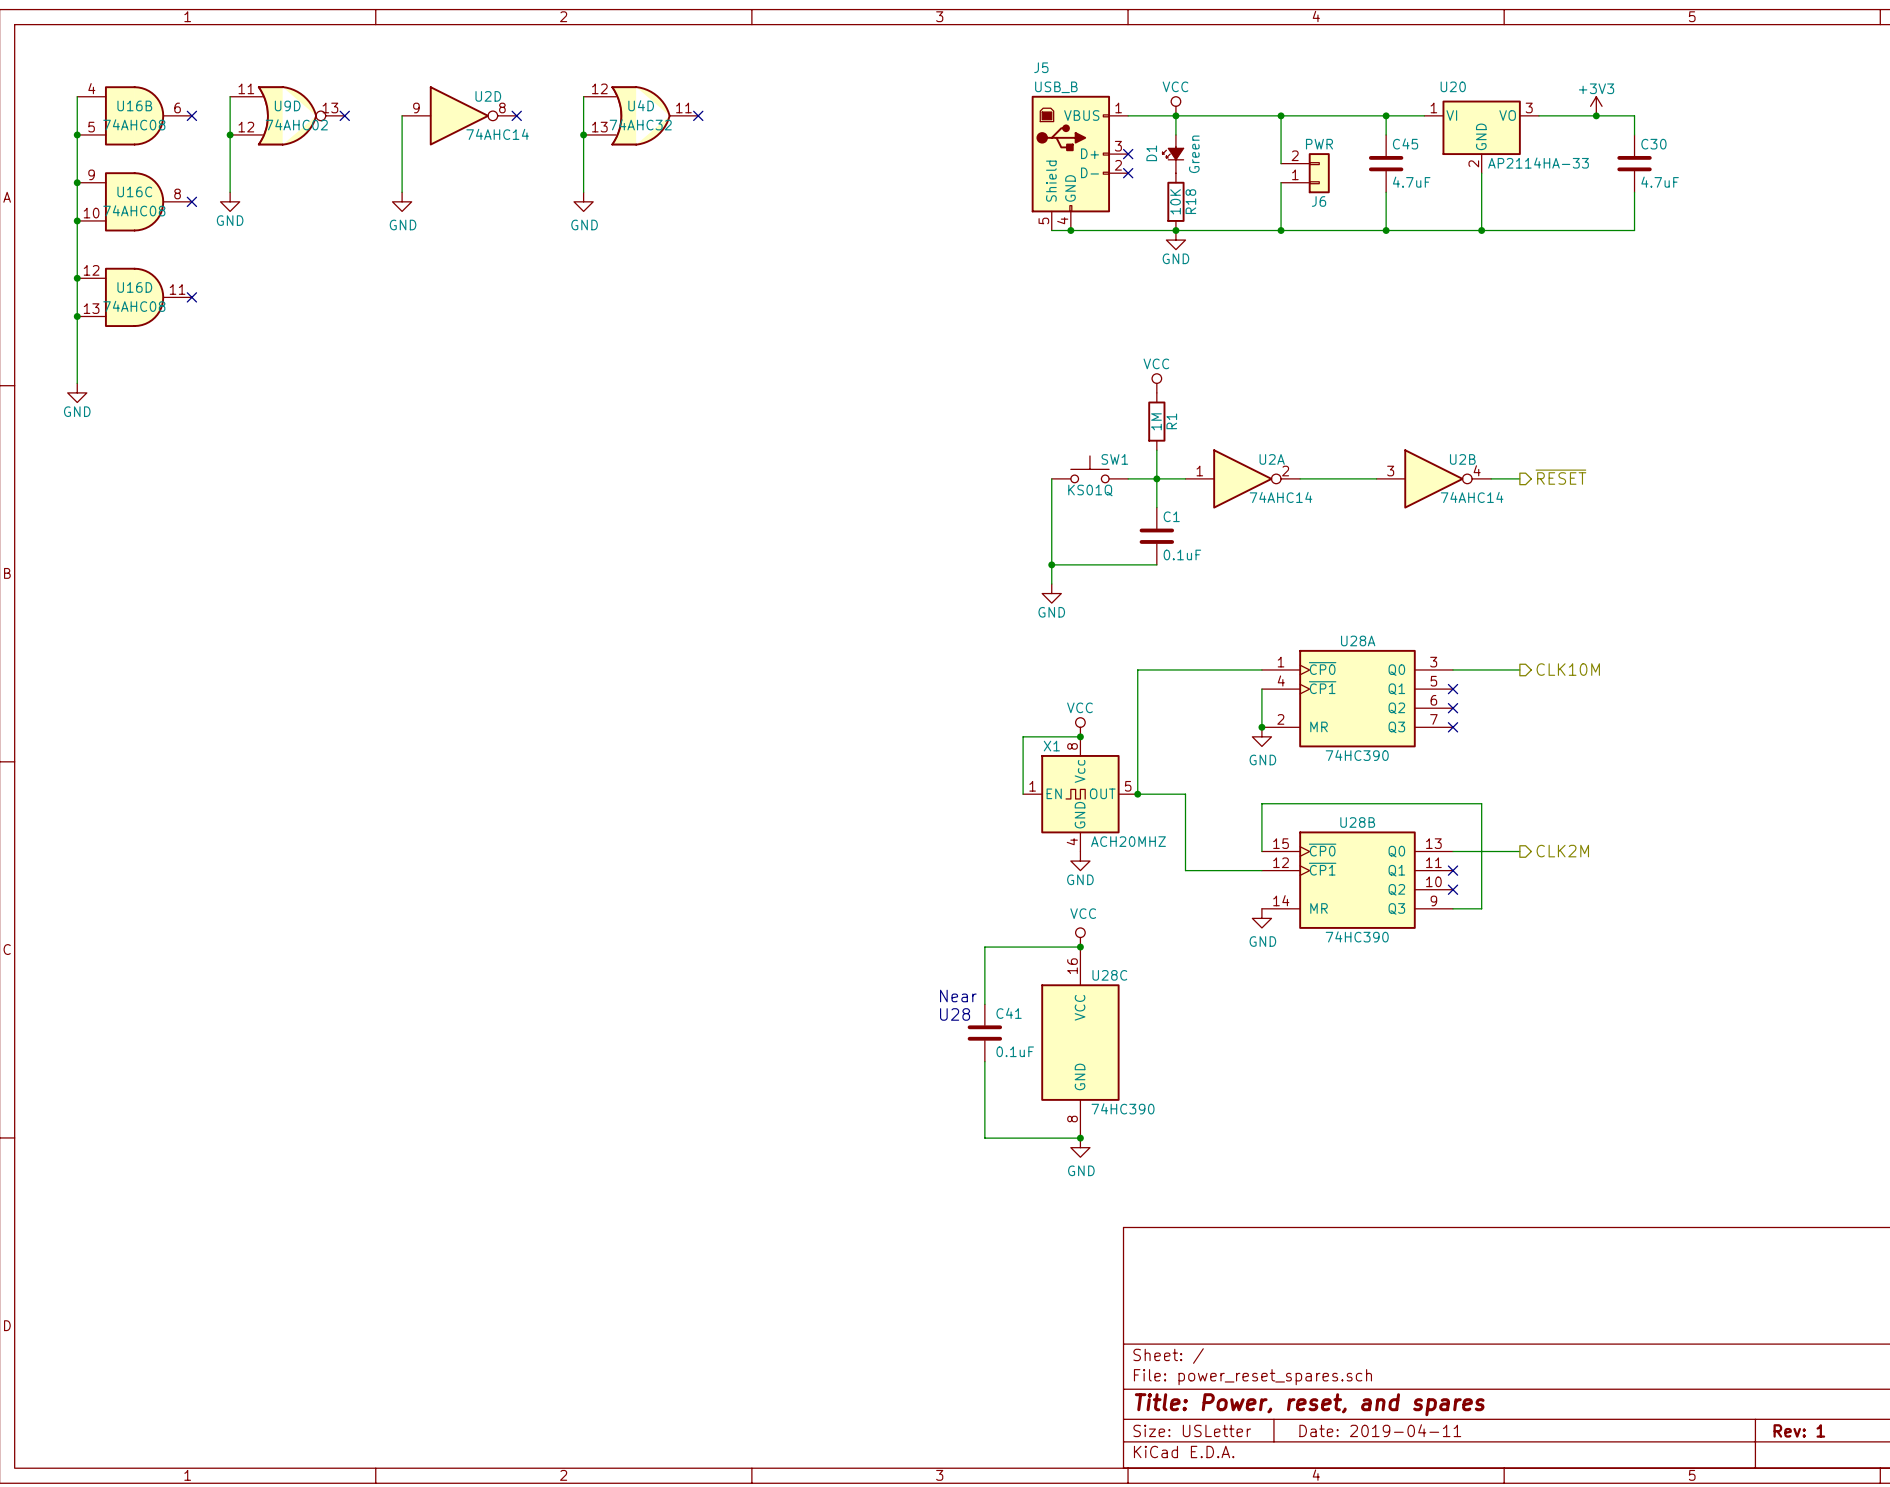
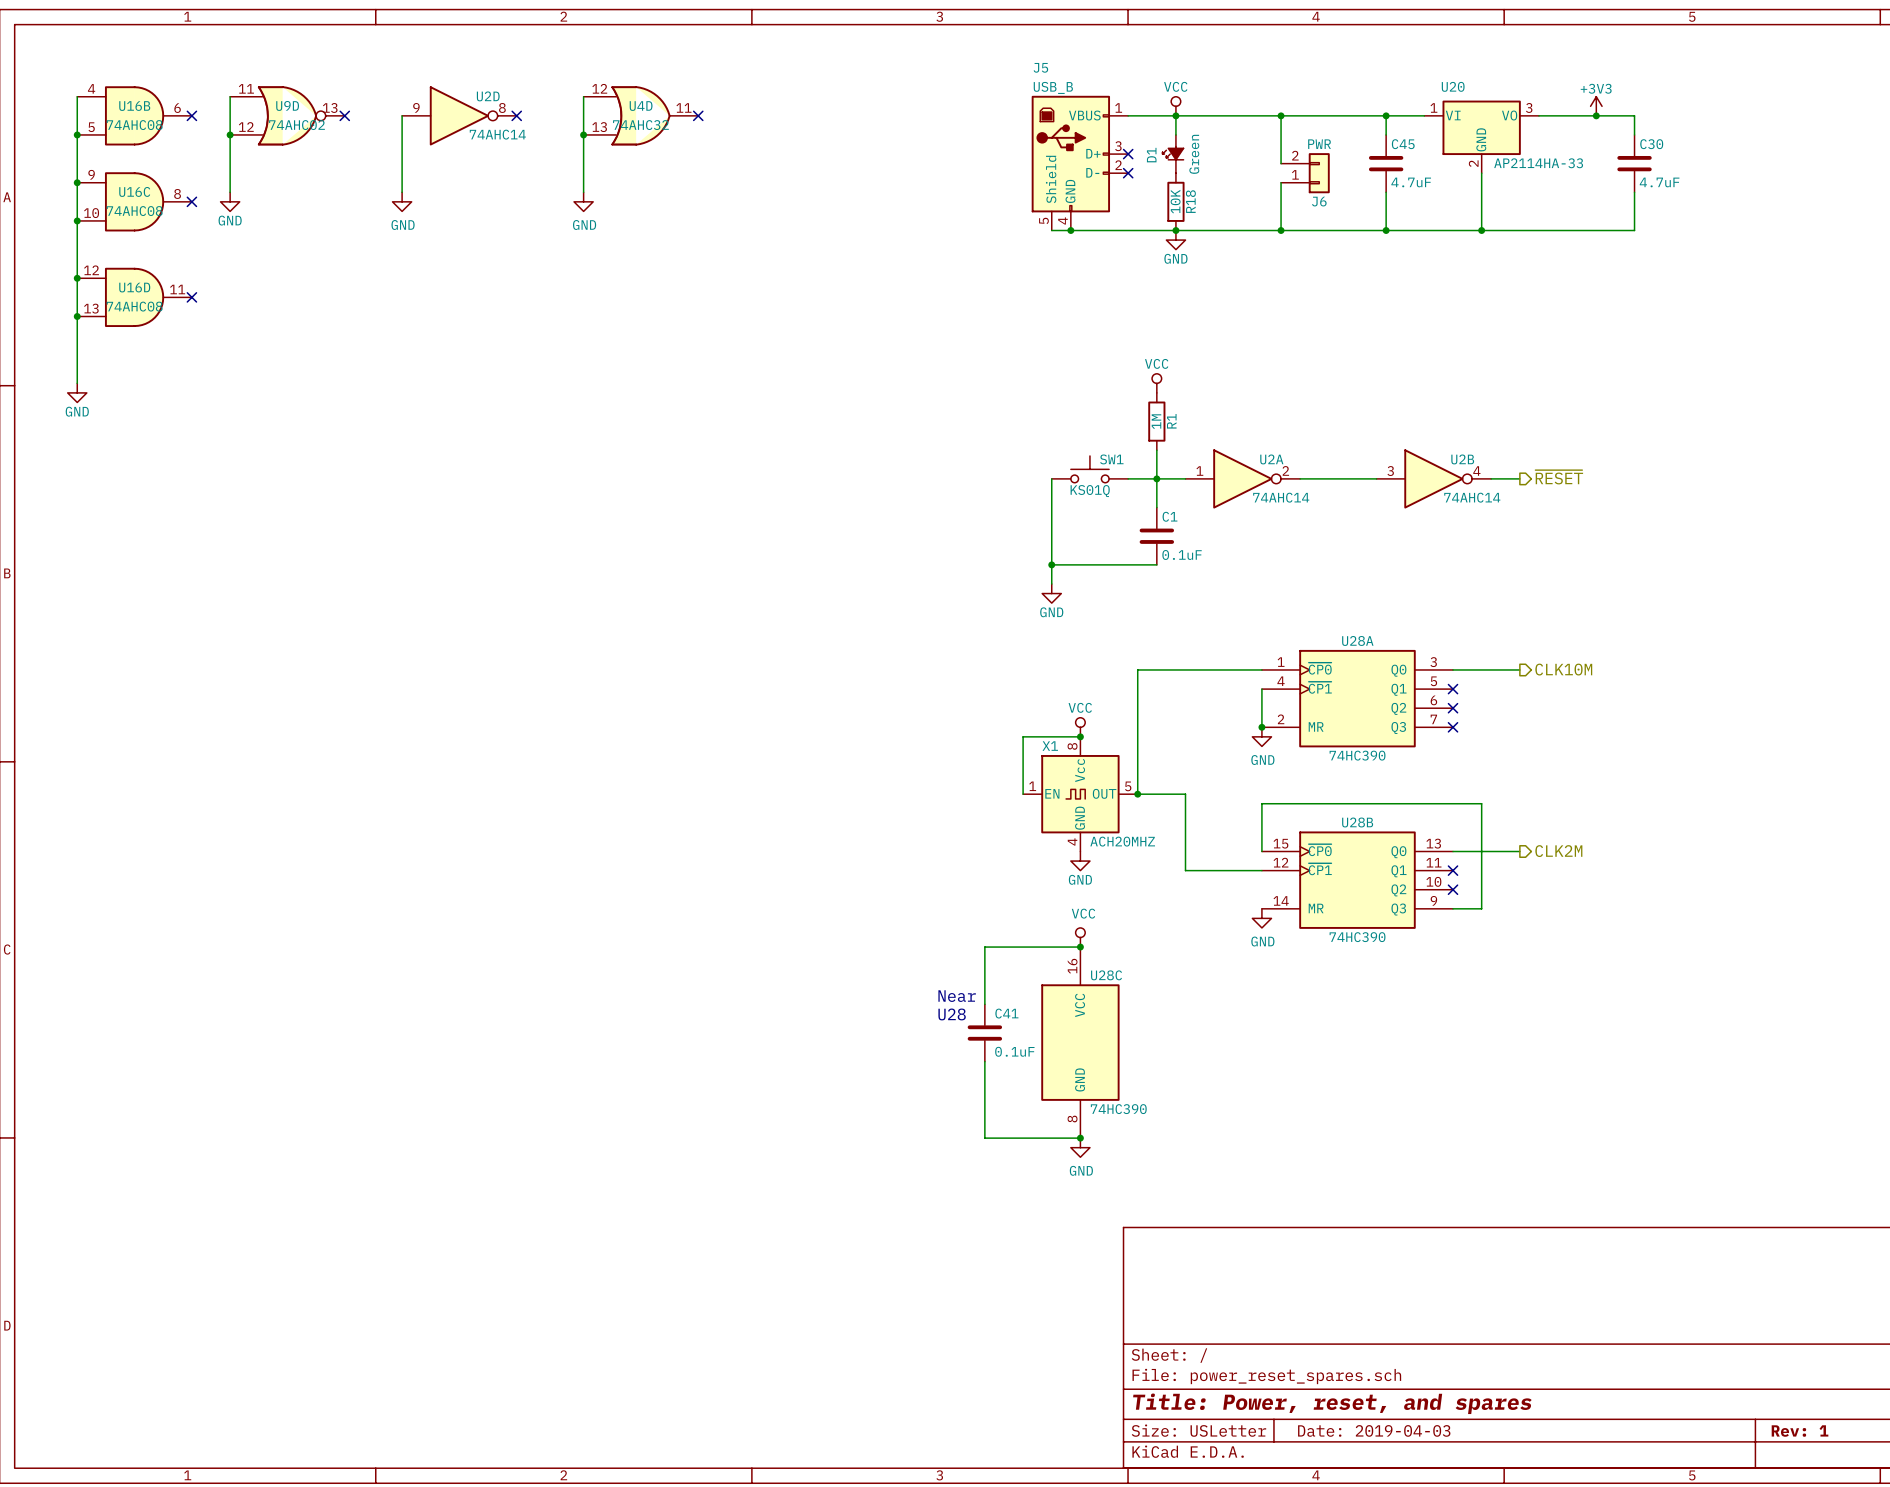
title block: Date: 2019-04-11 (1380, 1430) -> Date: 2019-04-03 (1374, 1430)

